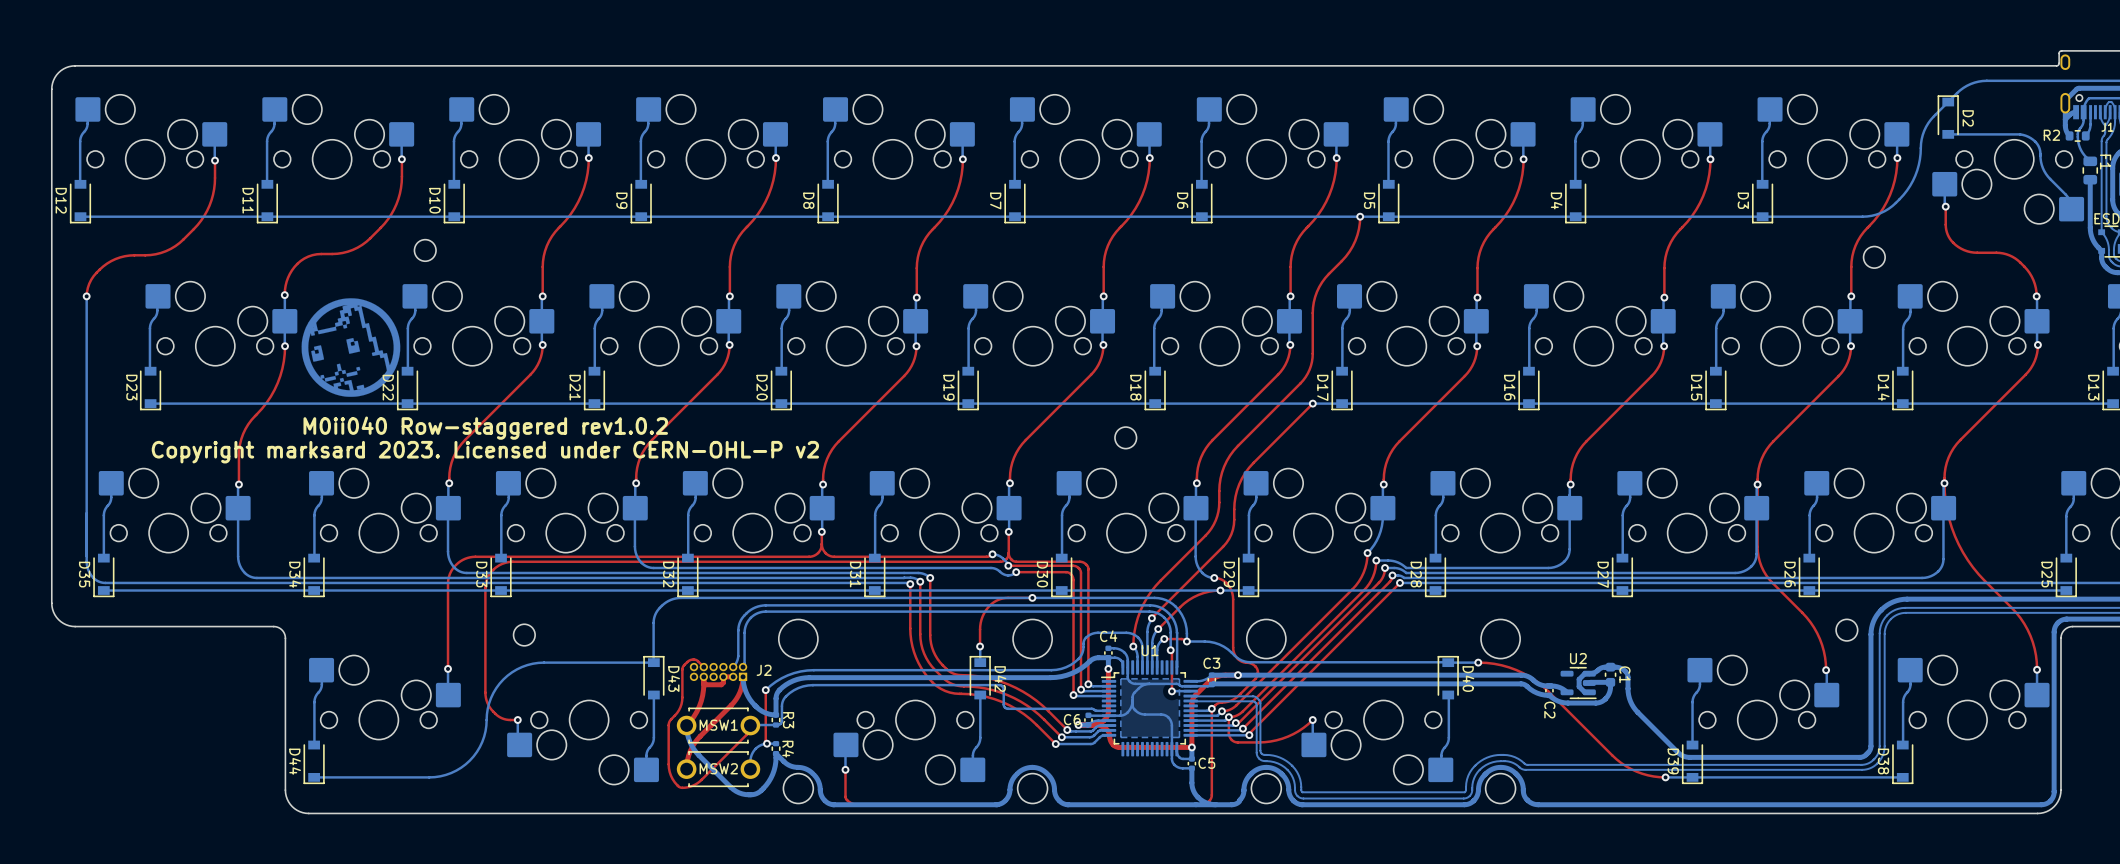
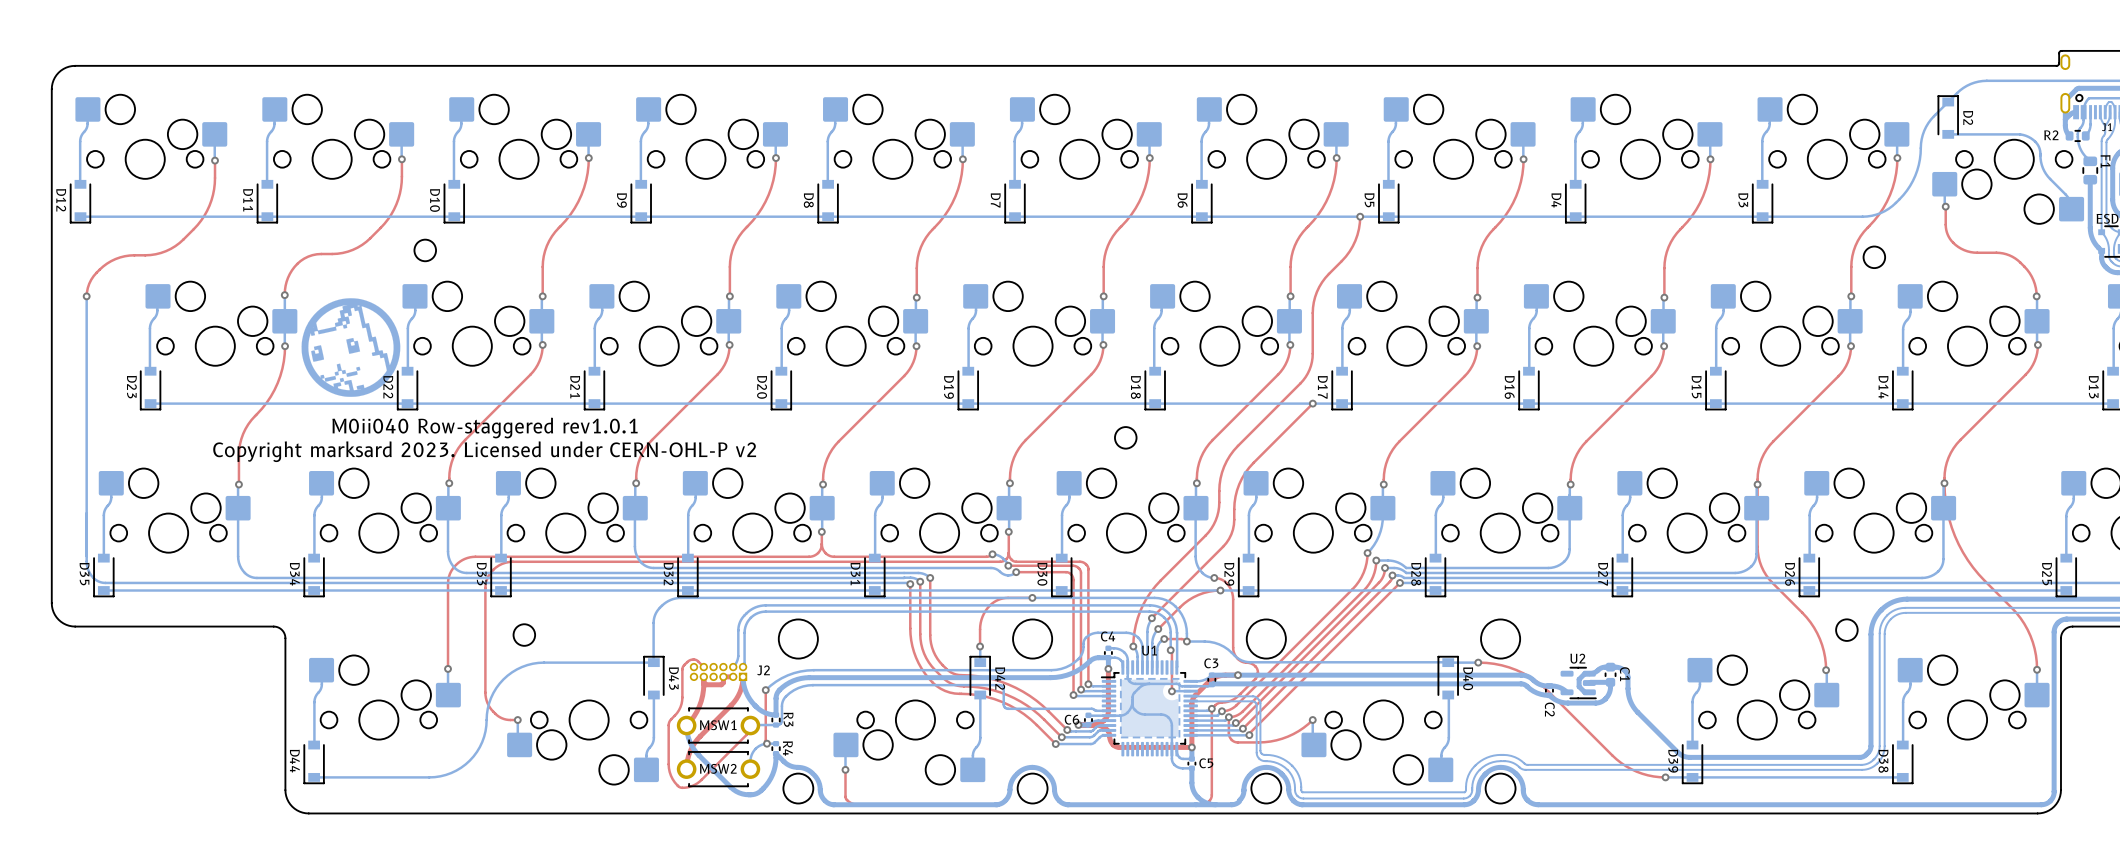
text: M0ii040 Row-staggered rev1.0.2 (485, 428) -> M0ii040 Row-staggered rev1.0.1 (485, 428)

